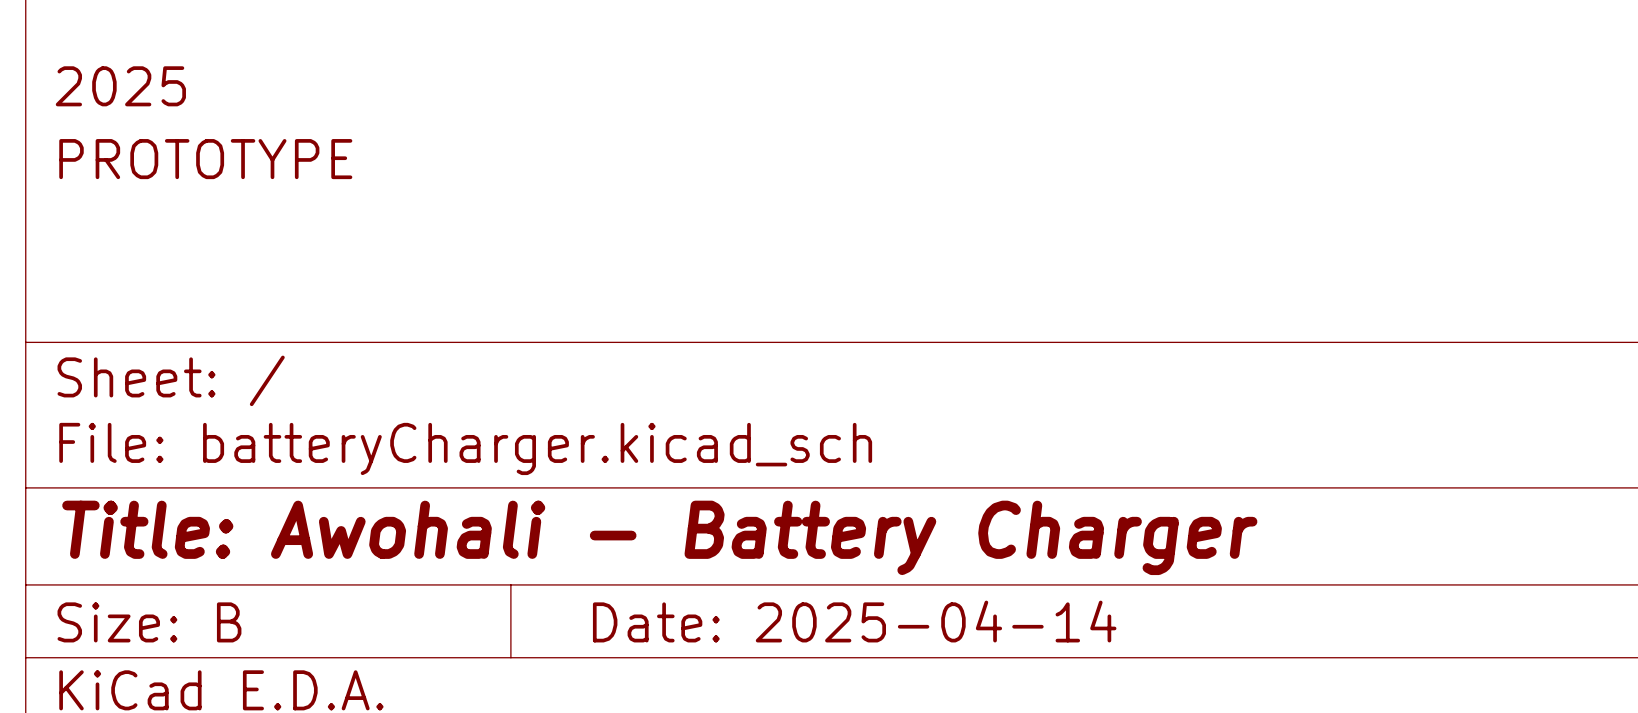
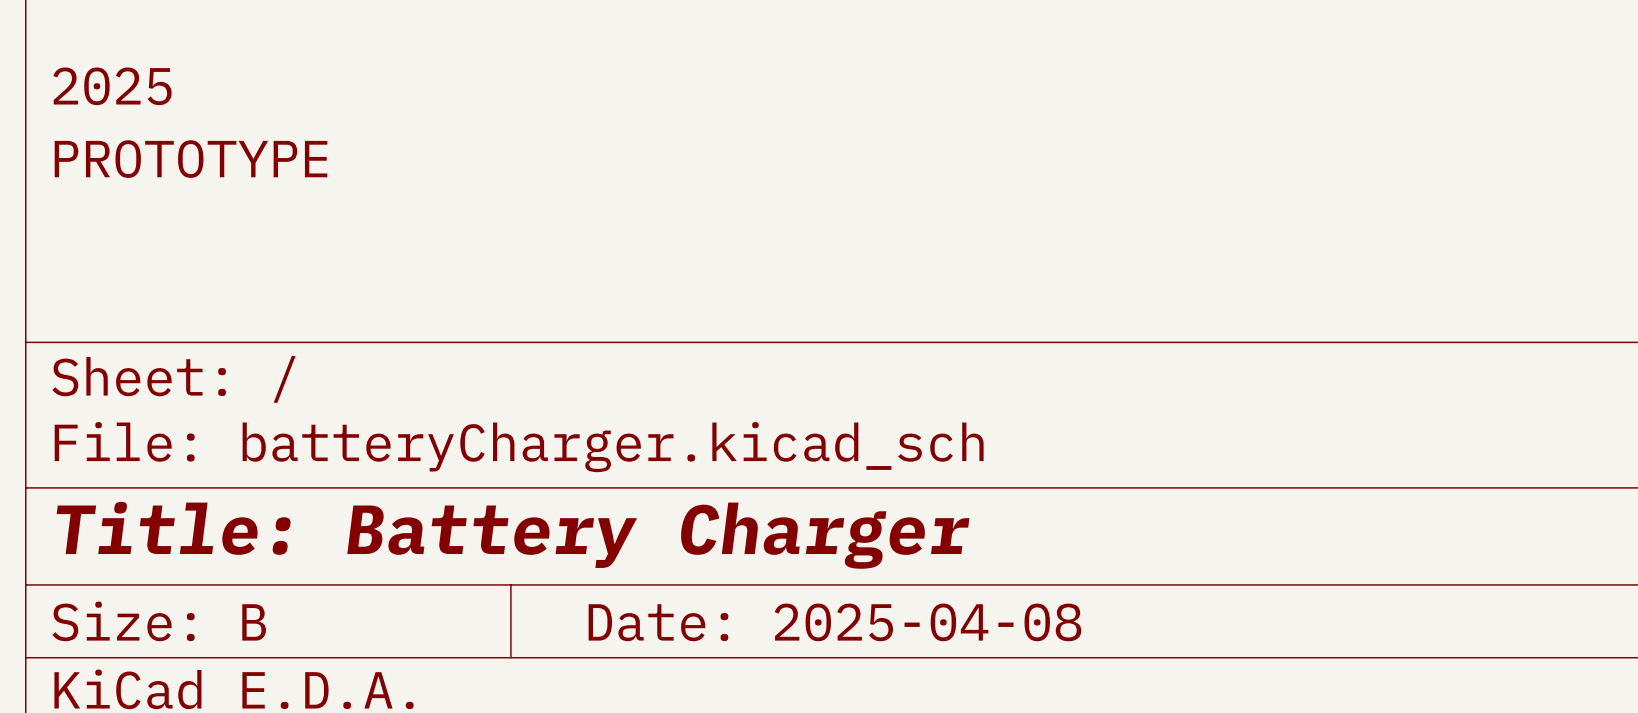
title block: Title: Awohali - Battery Charger (659, 537) -> Title: Battery Charger (513, 535)
title block: Date: 2025-04-14 (854, 621) -> Date: 2025-04-08 (834, 622)

